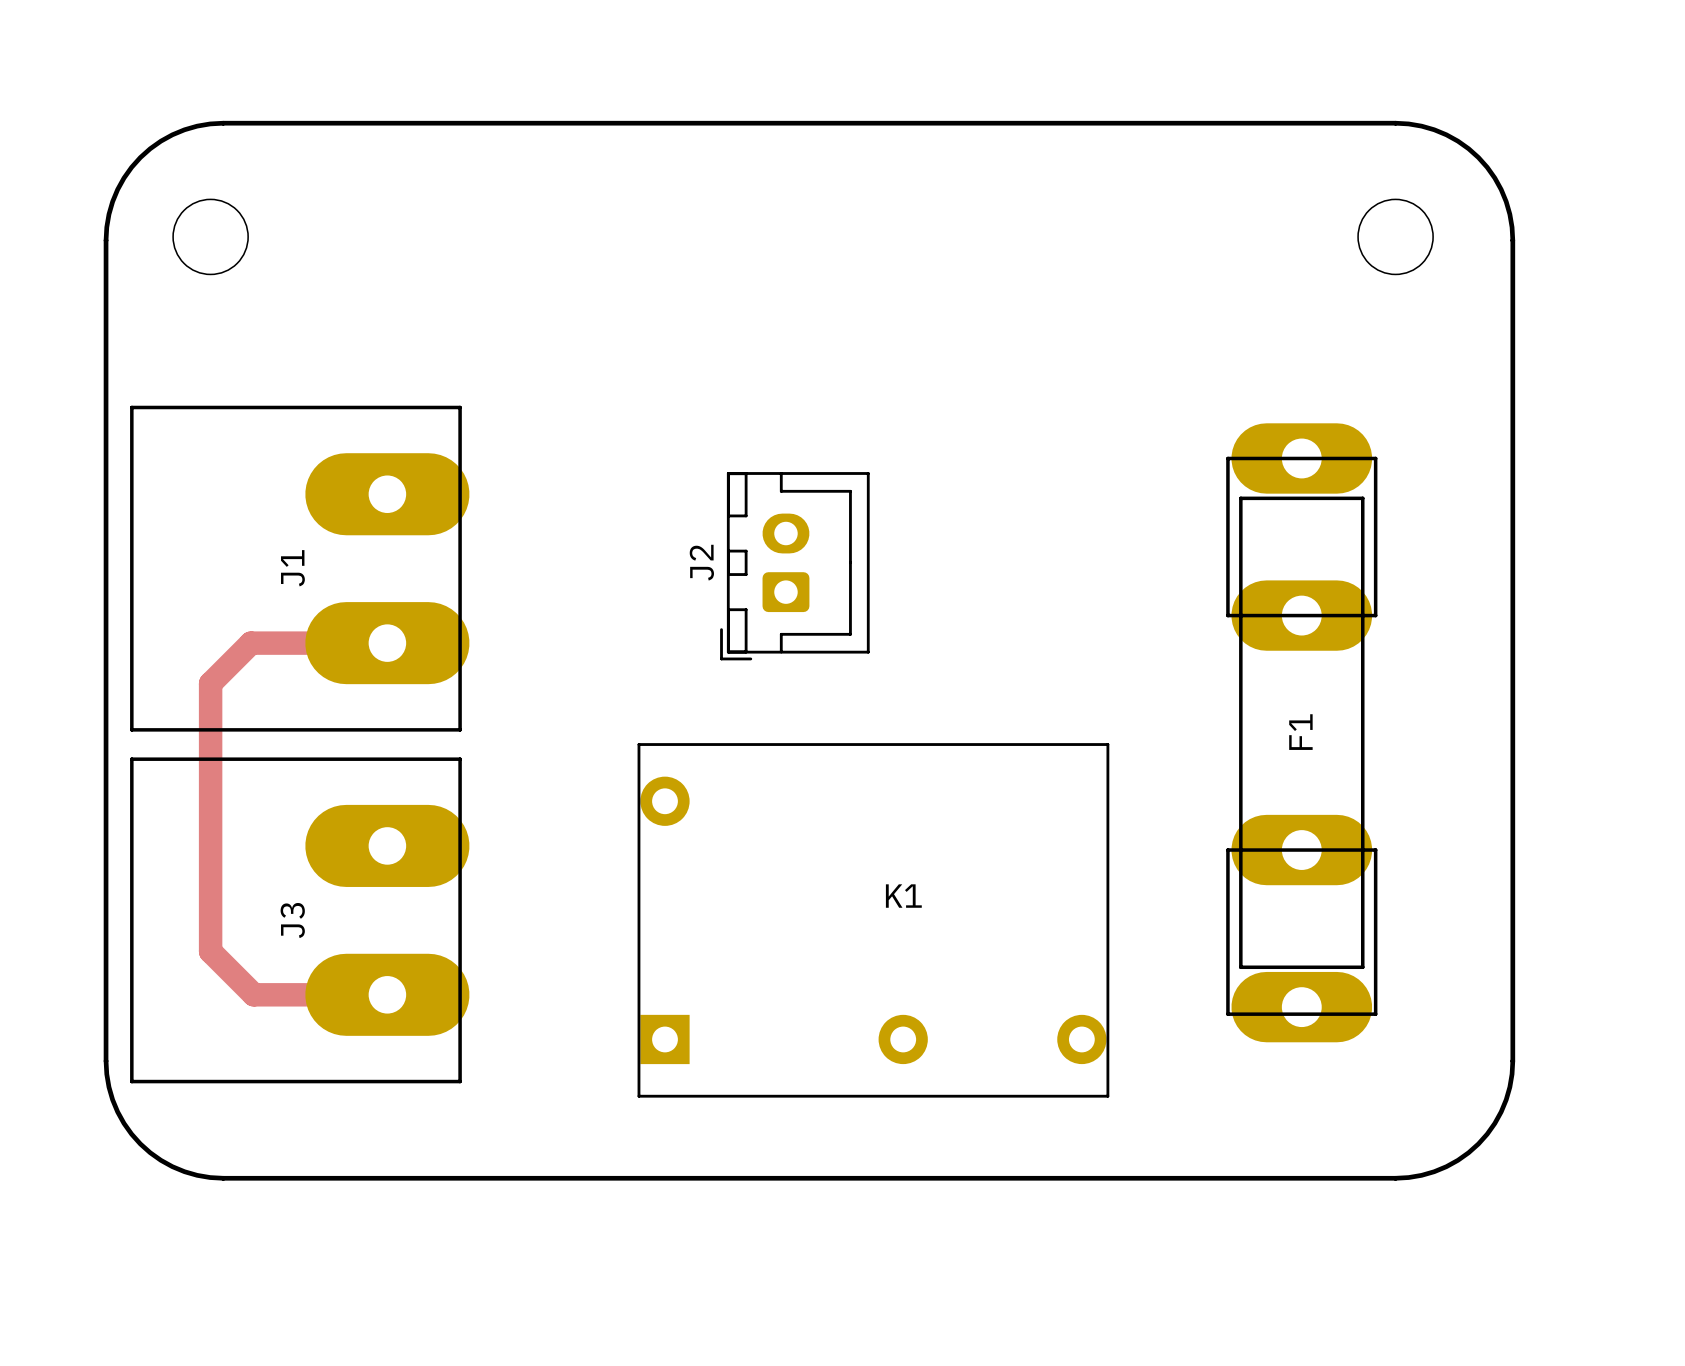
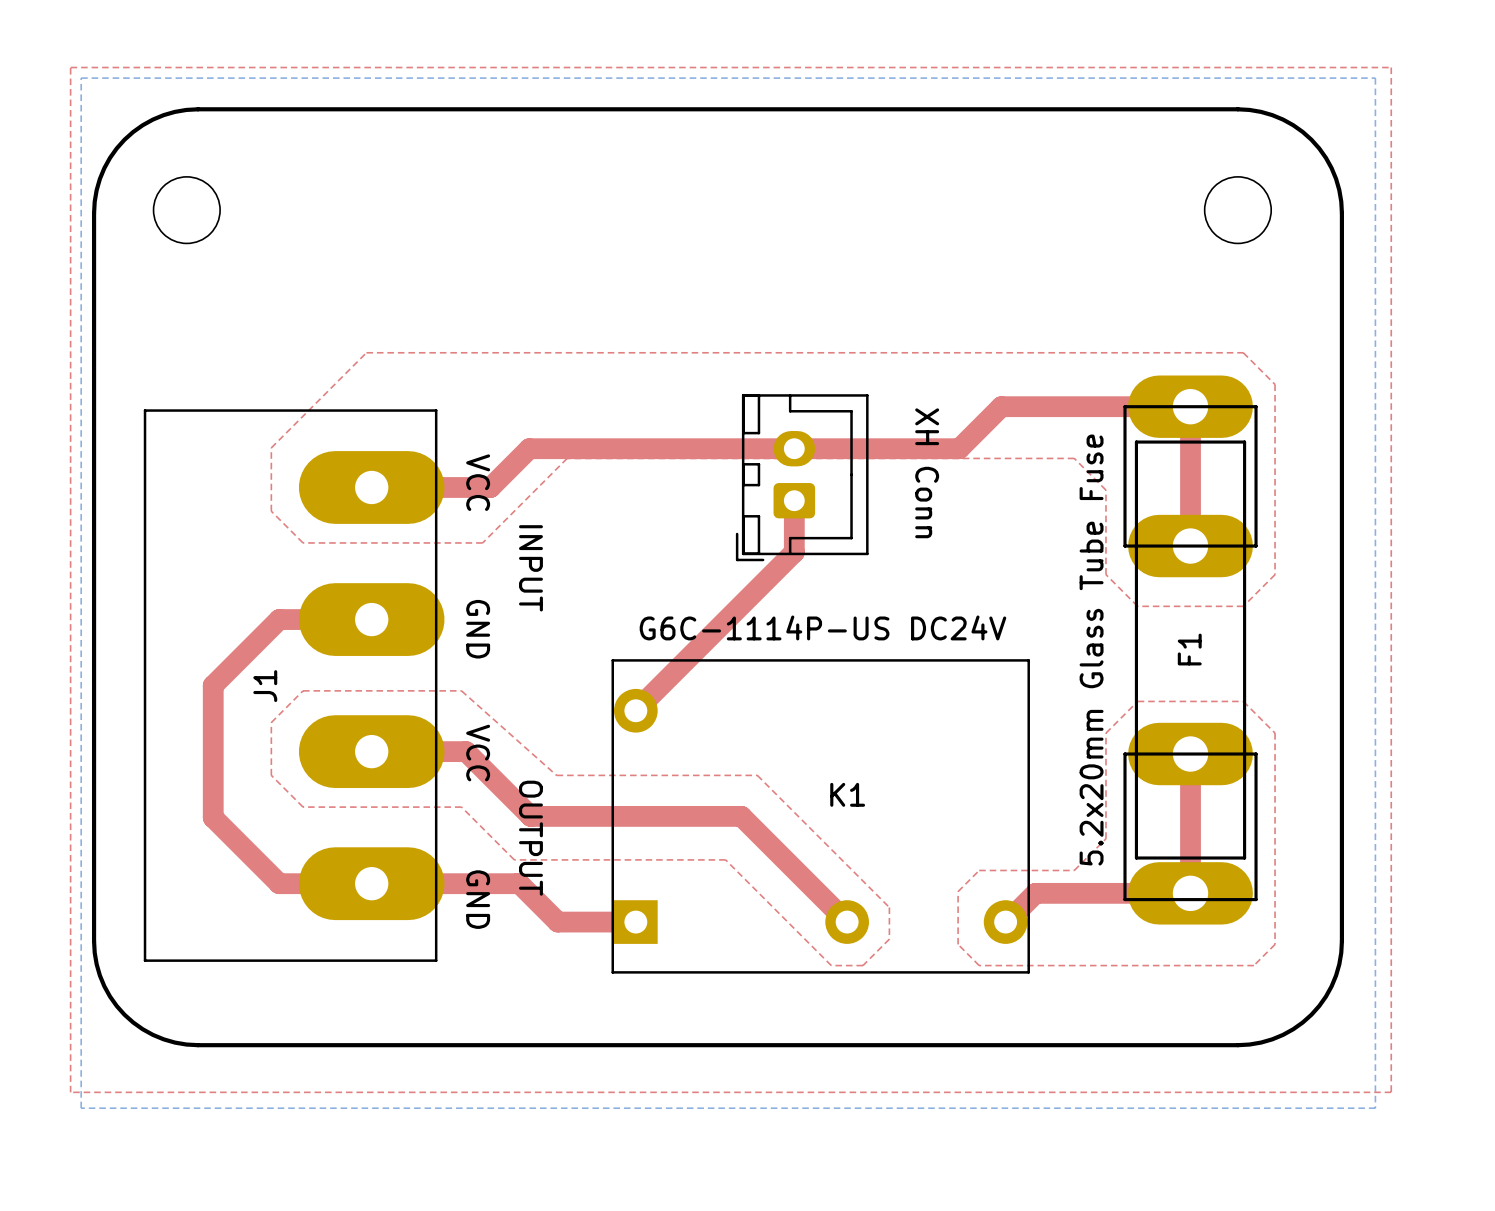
top zone outline: none -> (70, 67) (70, 1092) (1391, 1092) (1391, 67) (70, 67)
bottom zone outline: none -> (81, 78) (81, 1108) (1375, 1108) (1375, 78) (81, 78)
top zone outline: none -> (366, 352) (271, 447) (271, 511) (303, 542) (482, 542) (567, 458) (1074, 458) (1105, 490) (1105, 574) (1137, 606) (1243, 606) (1275, 574) (1275, 384) (1243, 352) (366, 352)
J1 footprint: [130, 405, 470, 732] -> [143, 409, 445, 962]
top track: none -> (1190, 406) (1190, 546)
top track: none -> (1190, 406) (1001, 406) (959, 448) (529, 448) (490, 487) (371, 487)
text: none -> XH Conn (927, 473)
part: none -> (802, 477)
text: none -> VCC (478, 482)
top track: none -> (794, 500) (794, 552) (635, 710)
J2: (794, 566) -> none
text: none -> INPUT (530, 568)
top track: (387, 643) (251, 643) (210, 683) (210, 951) (253, 994) (387, 994) -> none
top track: none -> (371, 619) (279, 619) (213, 685) (213, 817) (279, 883) (519, 883) (557, 922) (635, 922)
text: none -> G6C-1114P-US DC24V (822, 627)
text: none -> GND (478, 629)
text: none -> 5.2x20mm Glass Tube Fuse (1091, 650)
F1 position: (1301, 732) -> (1190, 650)
top zone outline: none -> (303, 690) (271, 722) (271, 775) (303, 807) (461, 807) (514, 859) (725, 859) (831, 965) (862, 965) (889, 939) (889, 907) (757, 775) (556, 775) (461, 690) (303, 690)
top zone outline: none -> (1137, 701) (1105, 733) (1105, 838) (1074, 870) (979, 870) (958, 891) (958, 944) (979, 965) (1253, 965) (1275, 944) (1275, 733) (1243, 701) (1137, 701)
top track: none -> (371, 751) (466, 751) (530, 816) (741, 816) (847, 922)
text: none -> VCC (478, 753)
top track: none -> (1190, 754) (1190, 893) (1035, 893) (1005, 922)
J3: (299, 920) -> none
K1 position: (873, 920) -> (820, 816)
text: none -> OUTPUT (530, 838)
text: none -> GND (478, 899)

